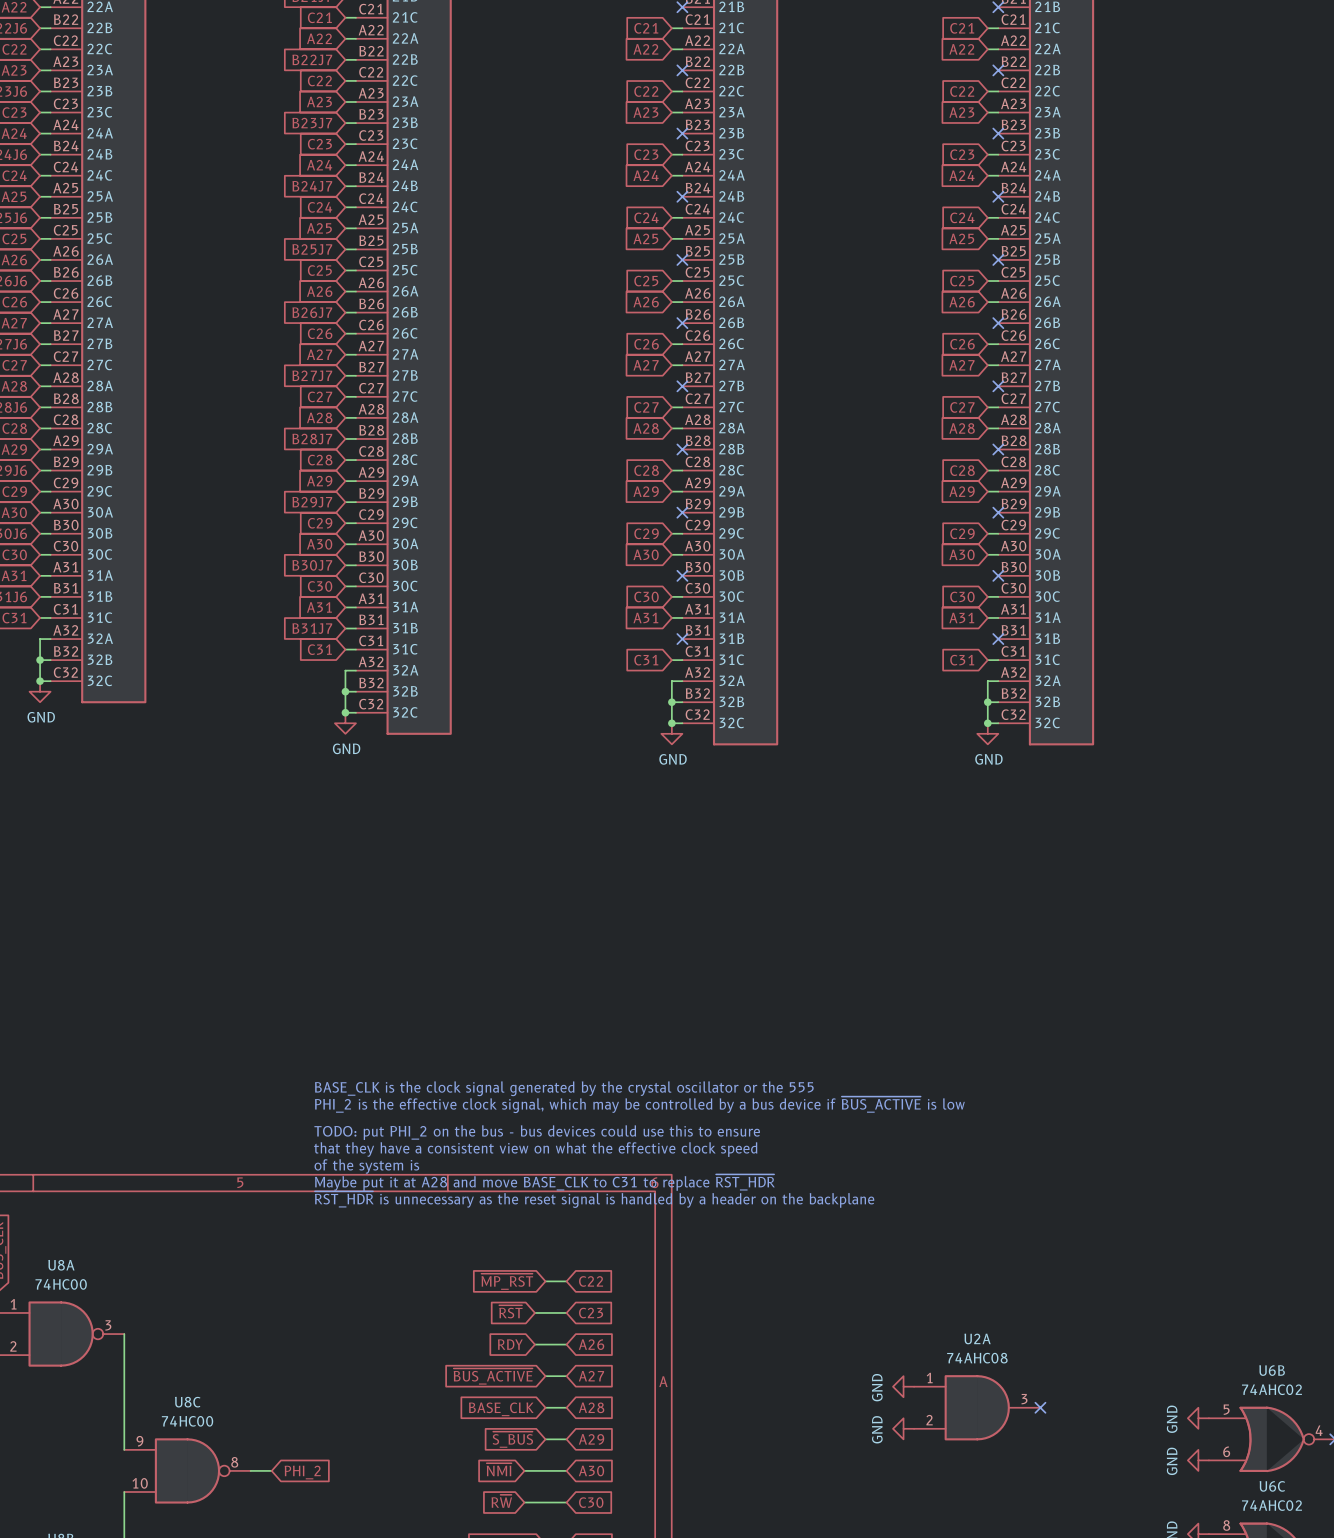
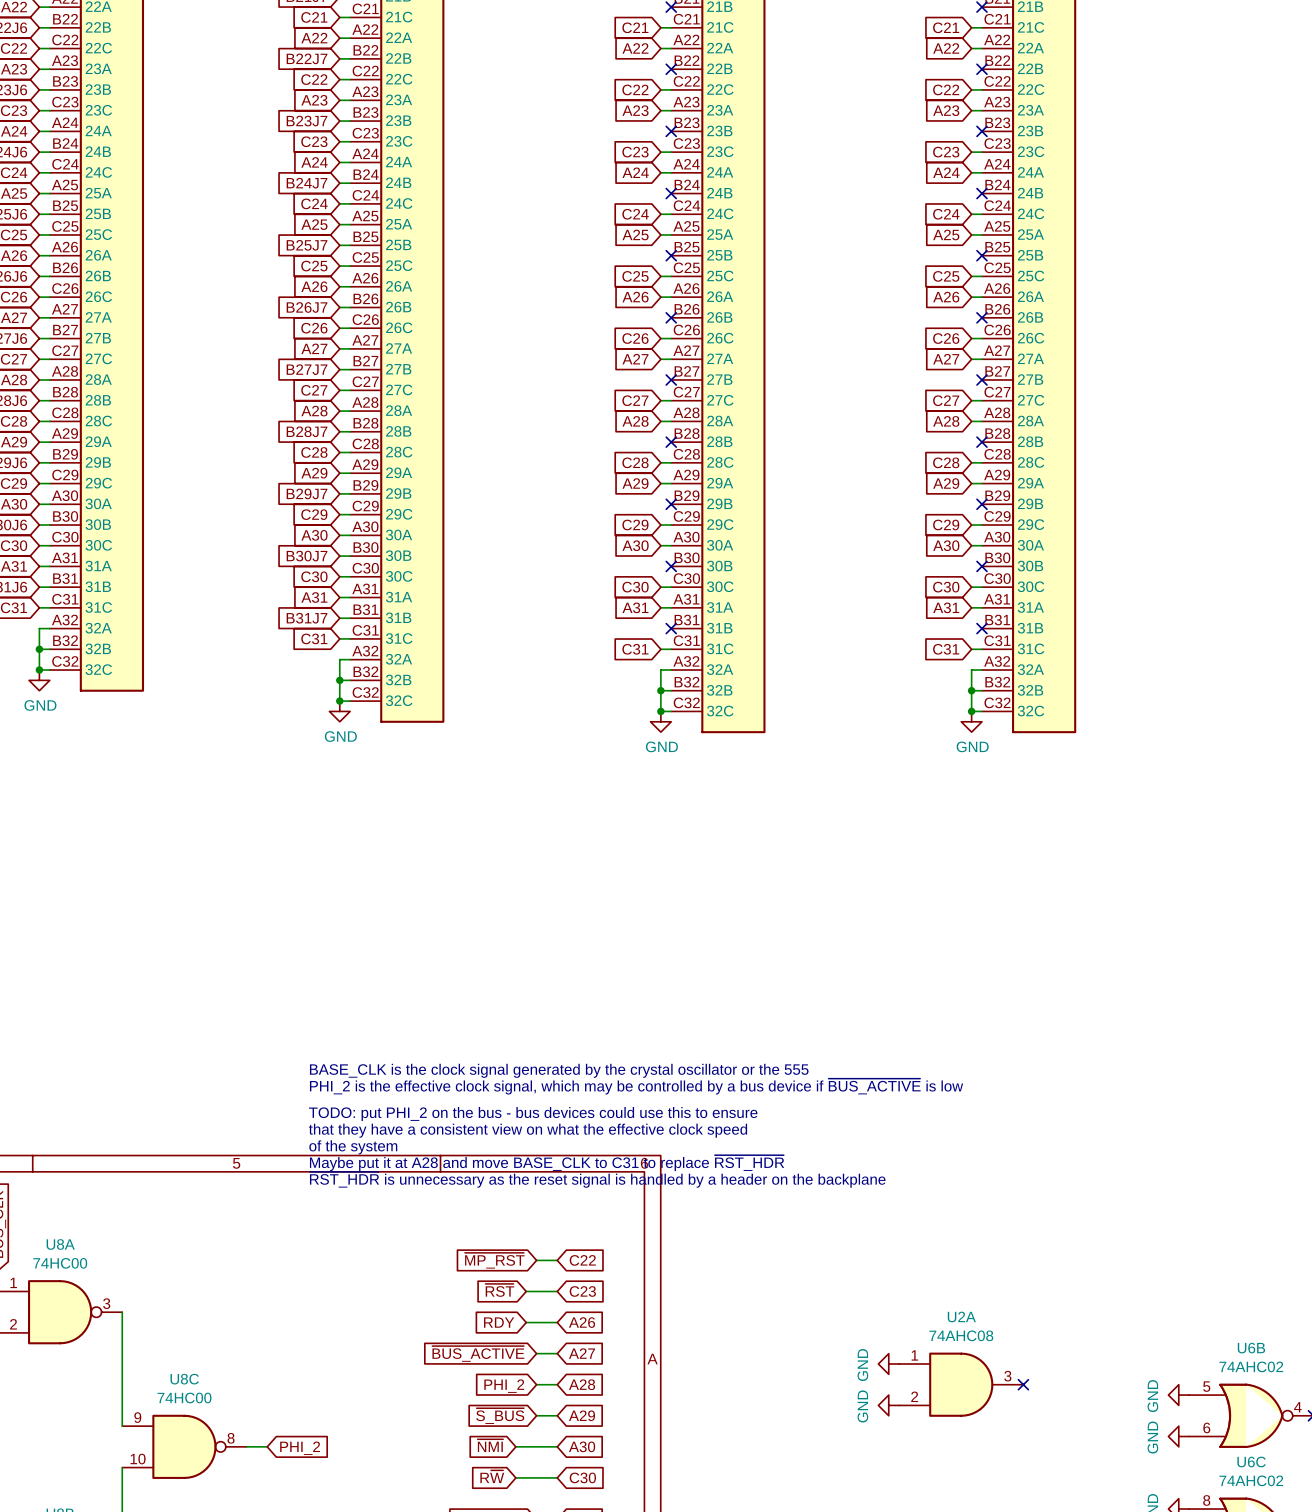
text: of the system is (366, 1166) -> of the system (353, 1147)
global label: BASE_CLK (501, 1409) -> PHI_2 (504, 1386)

